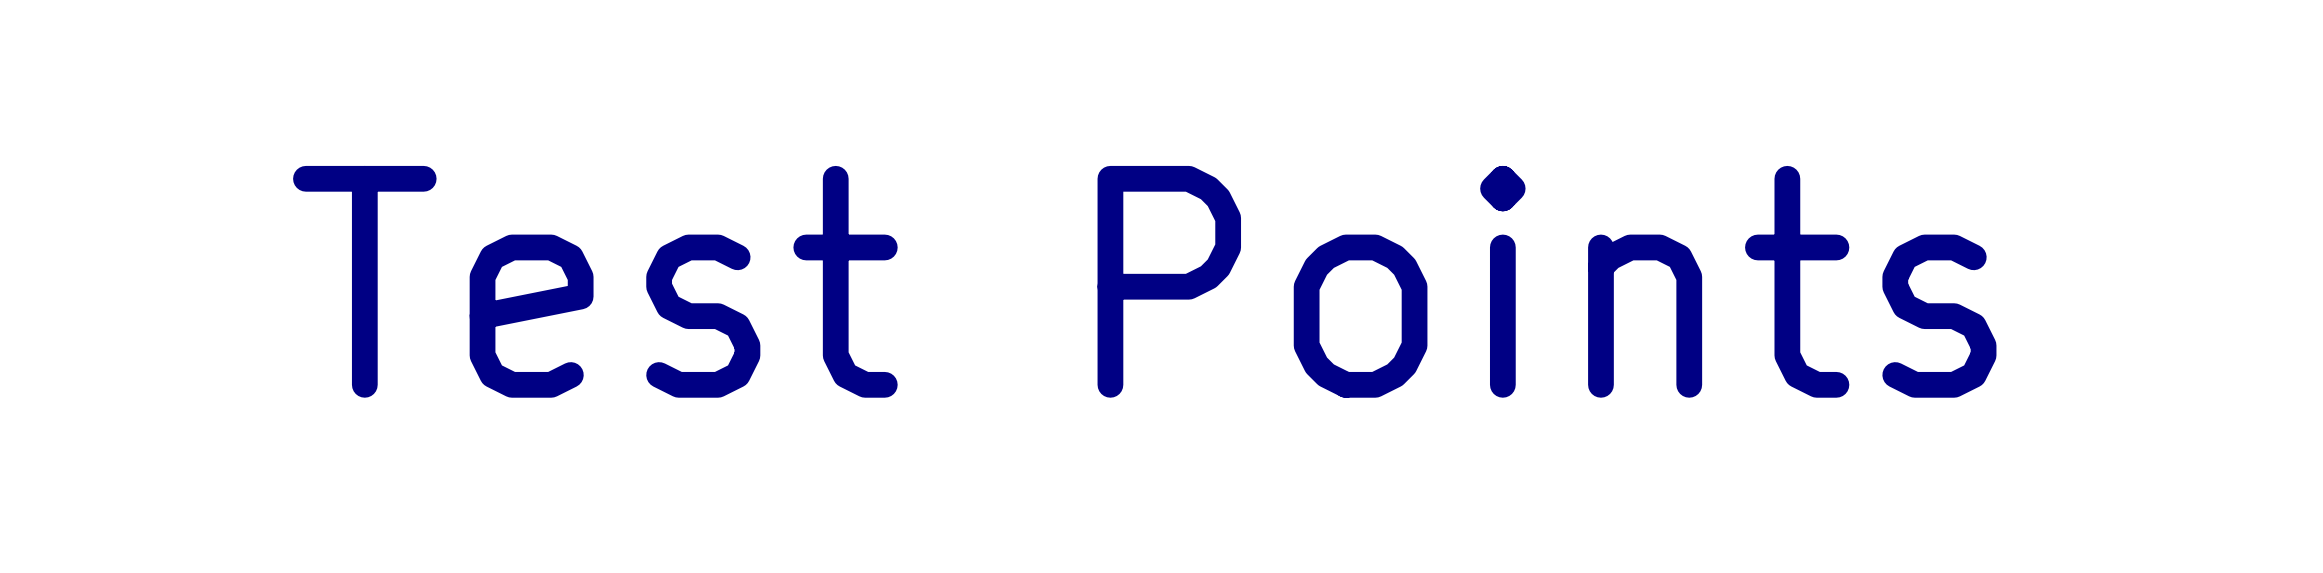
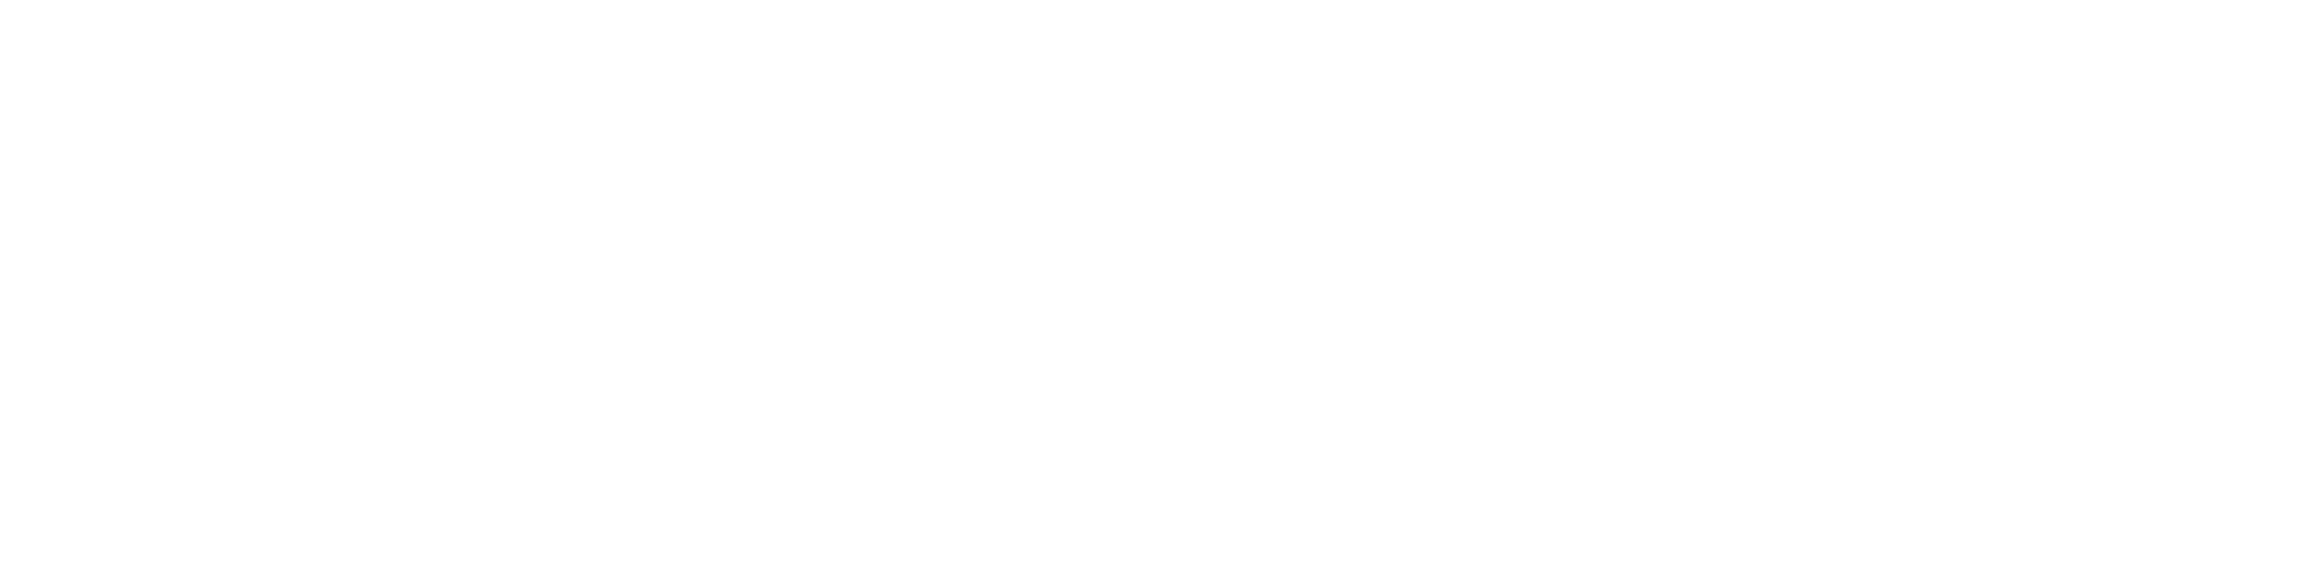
text: Test Points (1144, 281) -> none

